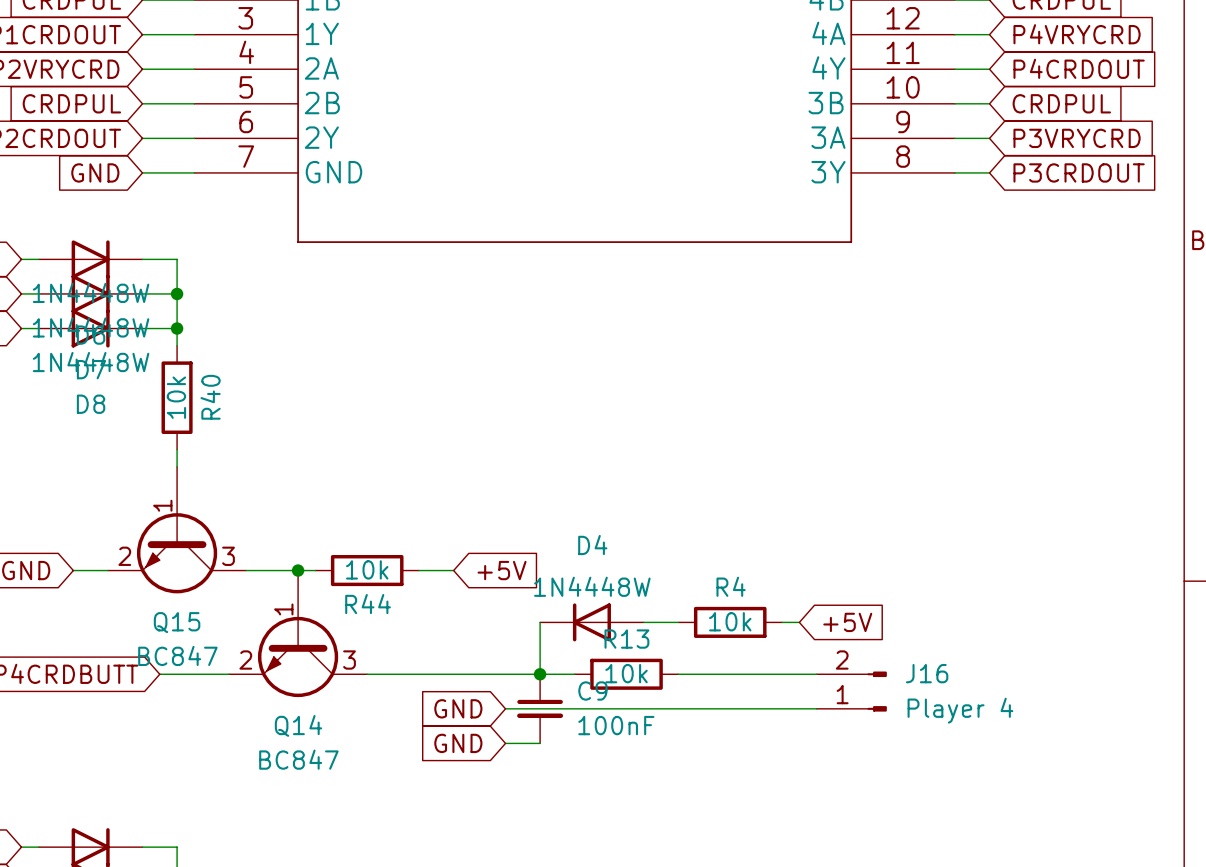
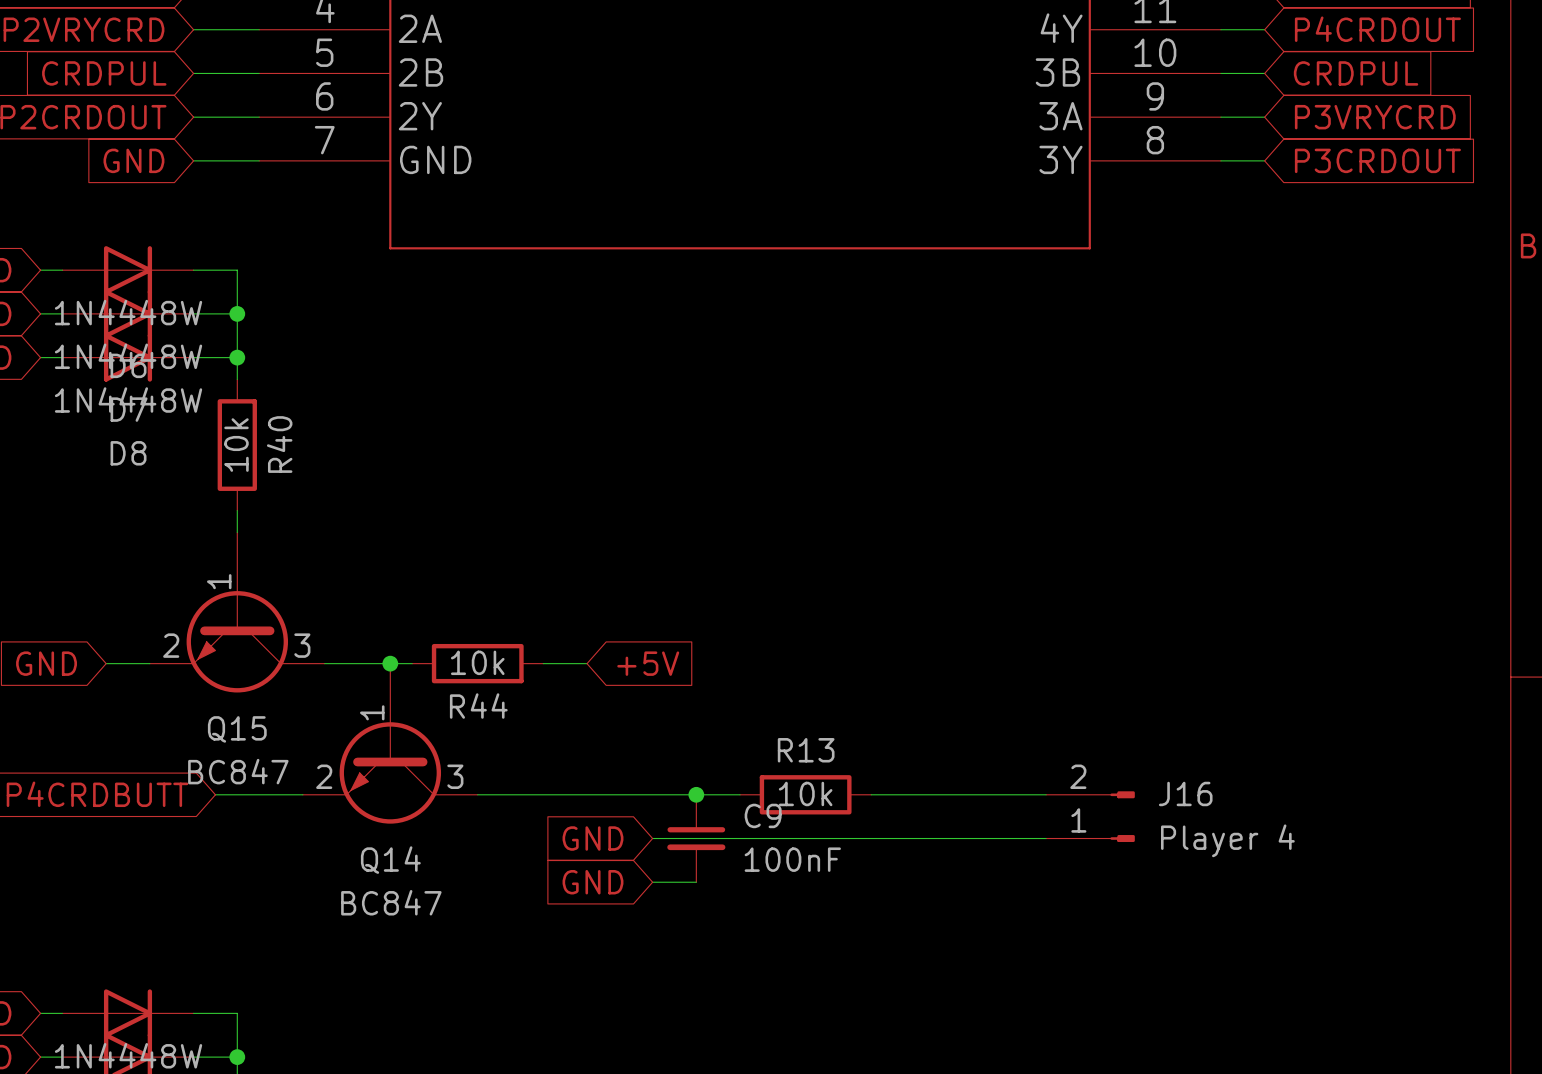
wire: (540, 622) (540, 674) -> none
D4: 1N4448W (591, 622) -> none
wire: (643, 622) (678, 622) -> none
R4: 10k (730, 622) -> none
wire: (782, 622) (799, 622) -> none
global label: +5V (847, 622) -> none

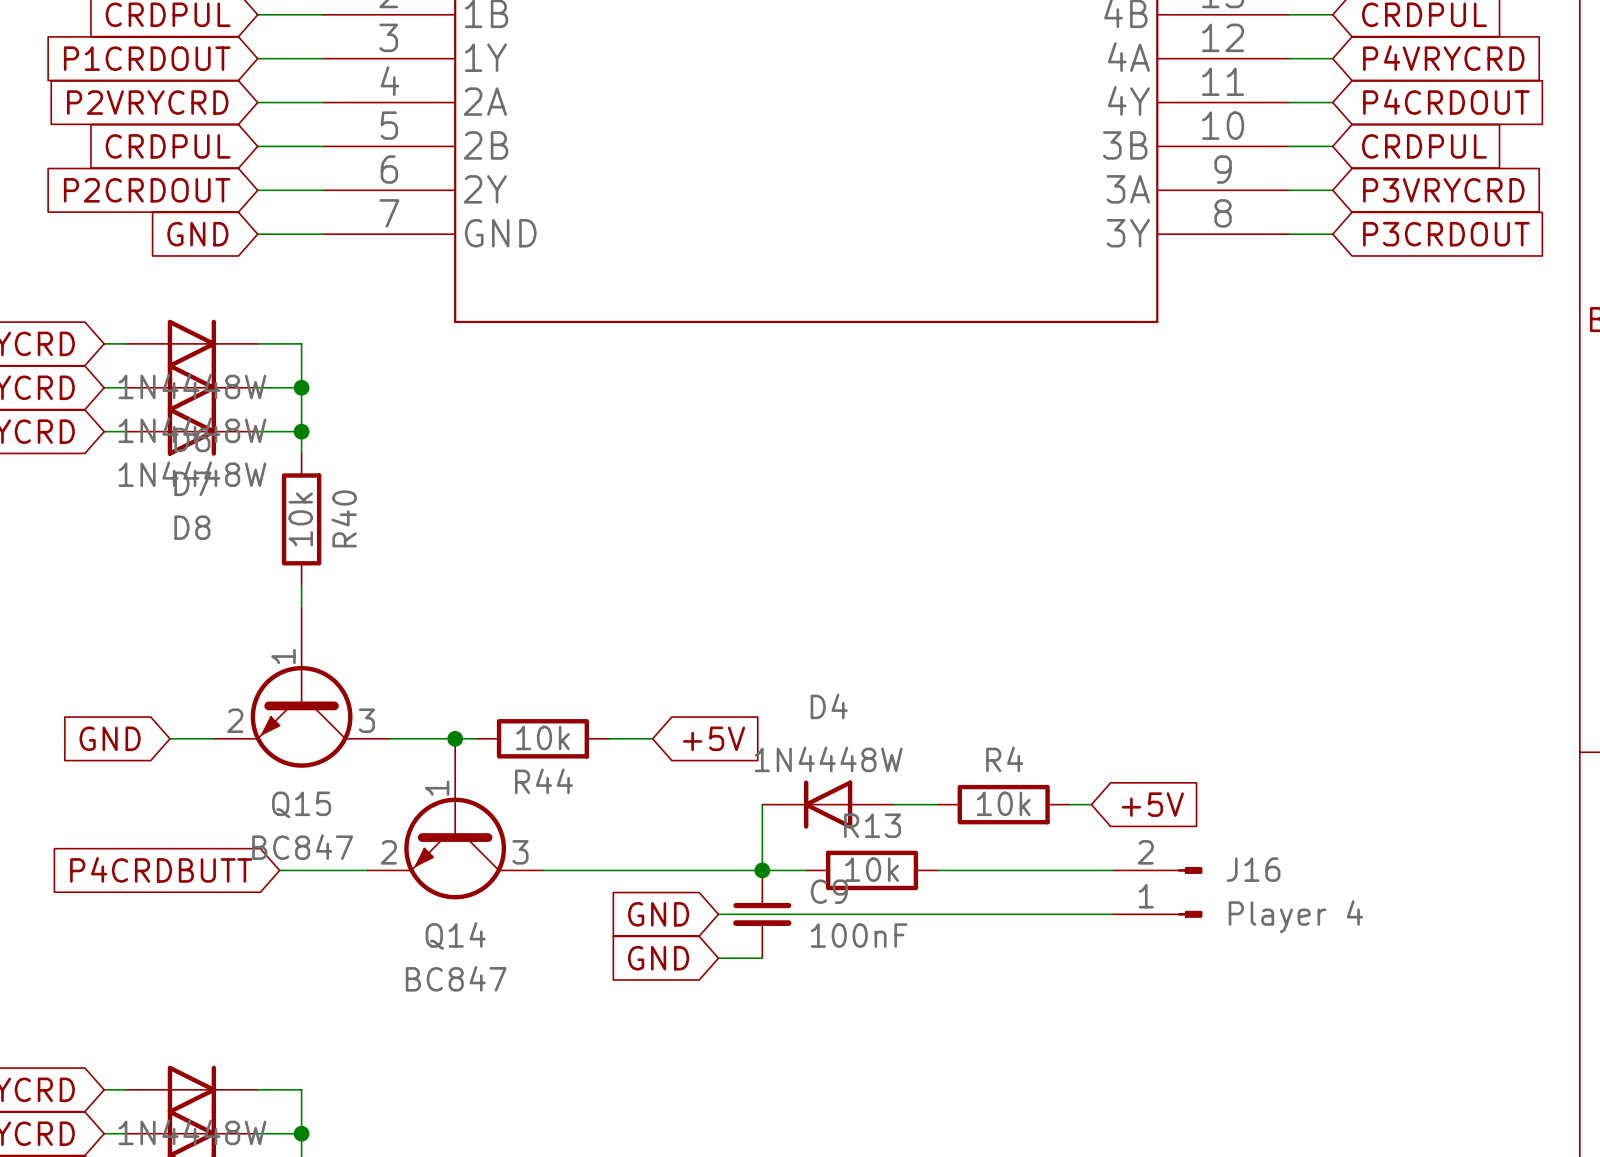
wire: none -> (762, 804) (762, 870)
D4: none -> 1N4448W (828, 804)
wire: none -> (893, 804) (937, 804)
R4: none -> 10k (1003, 804)
wire: none -> (1069, 804) (1091, 804)
global label: none -> +5V (1152, 804)

